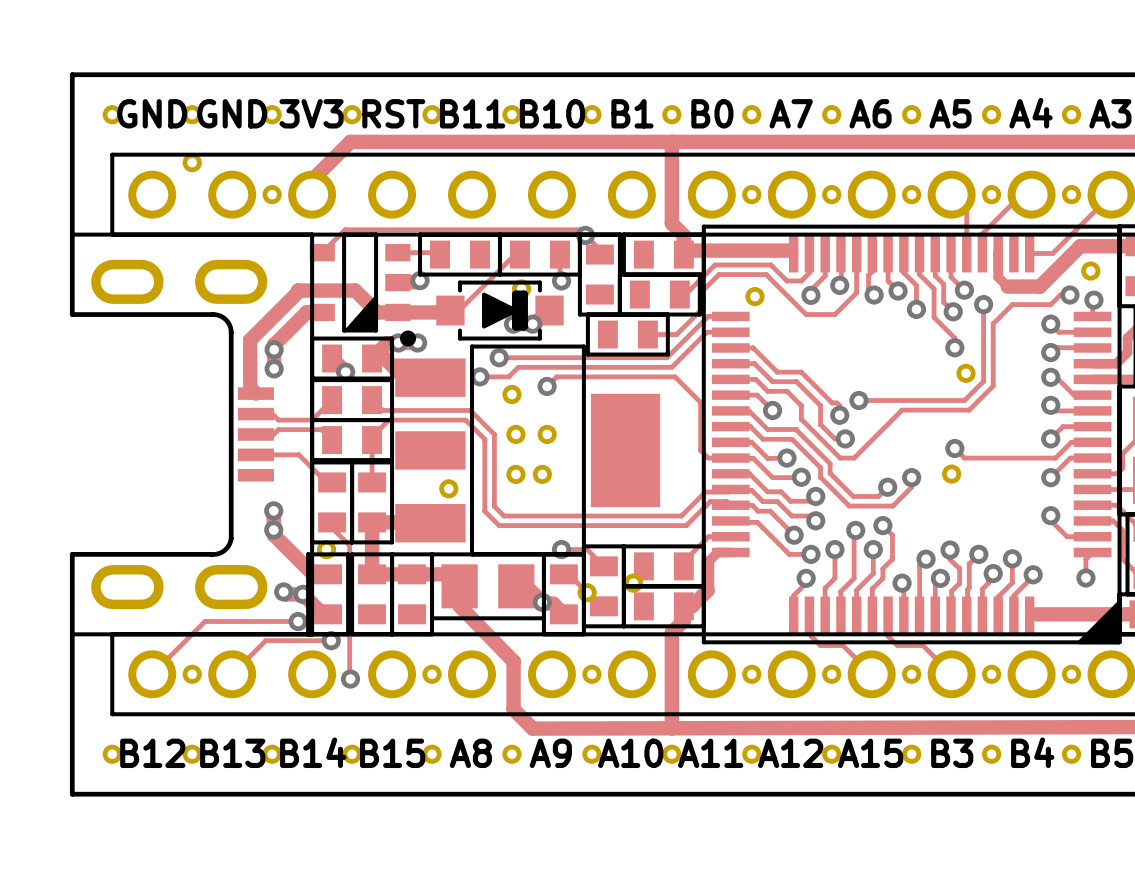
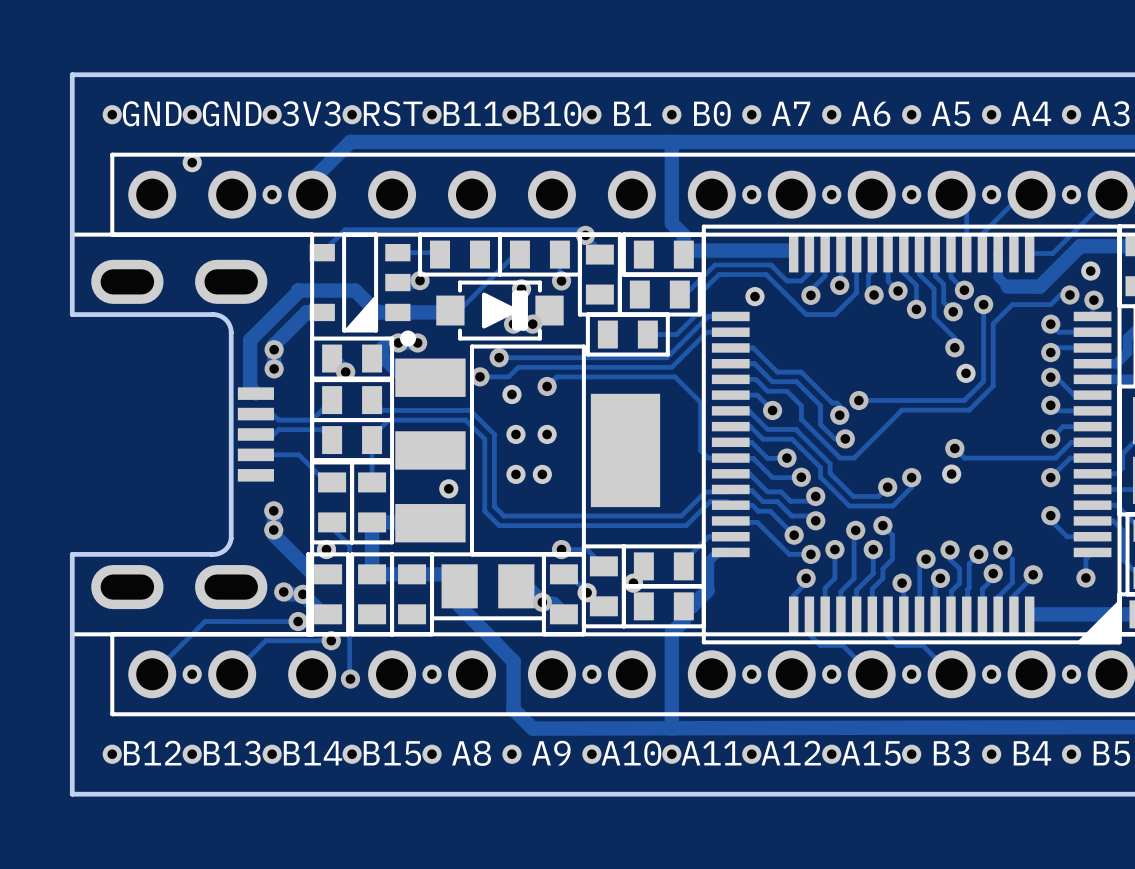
via position: (1012, 558) -> (1002, 550)

